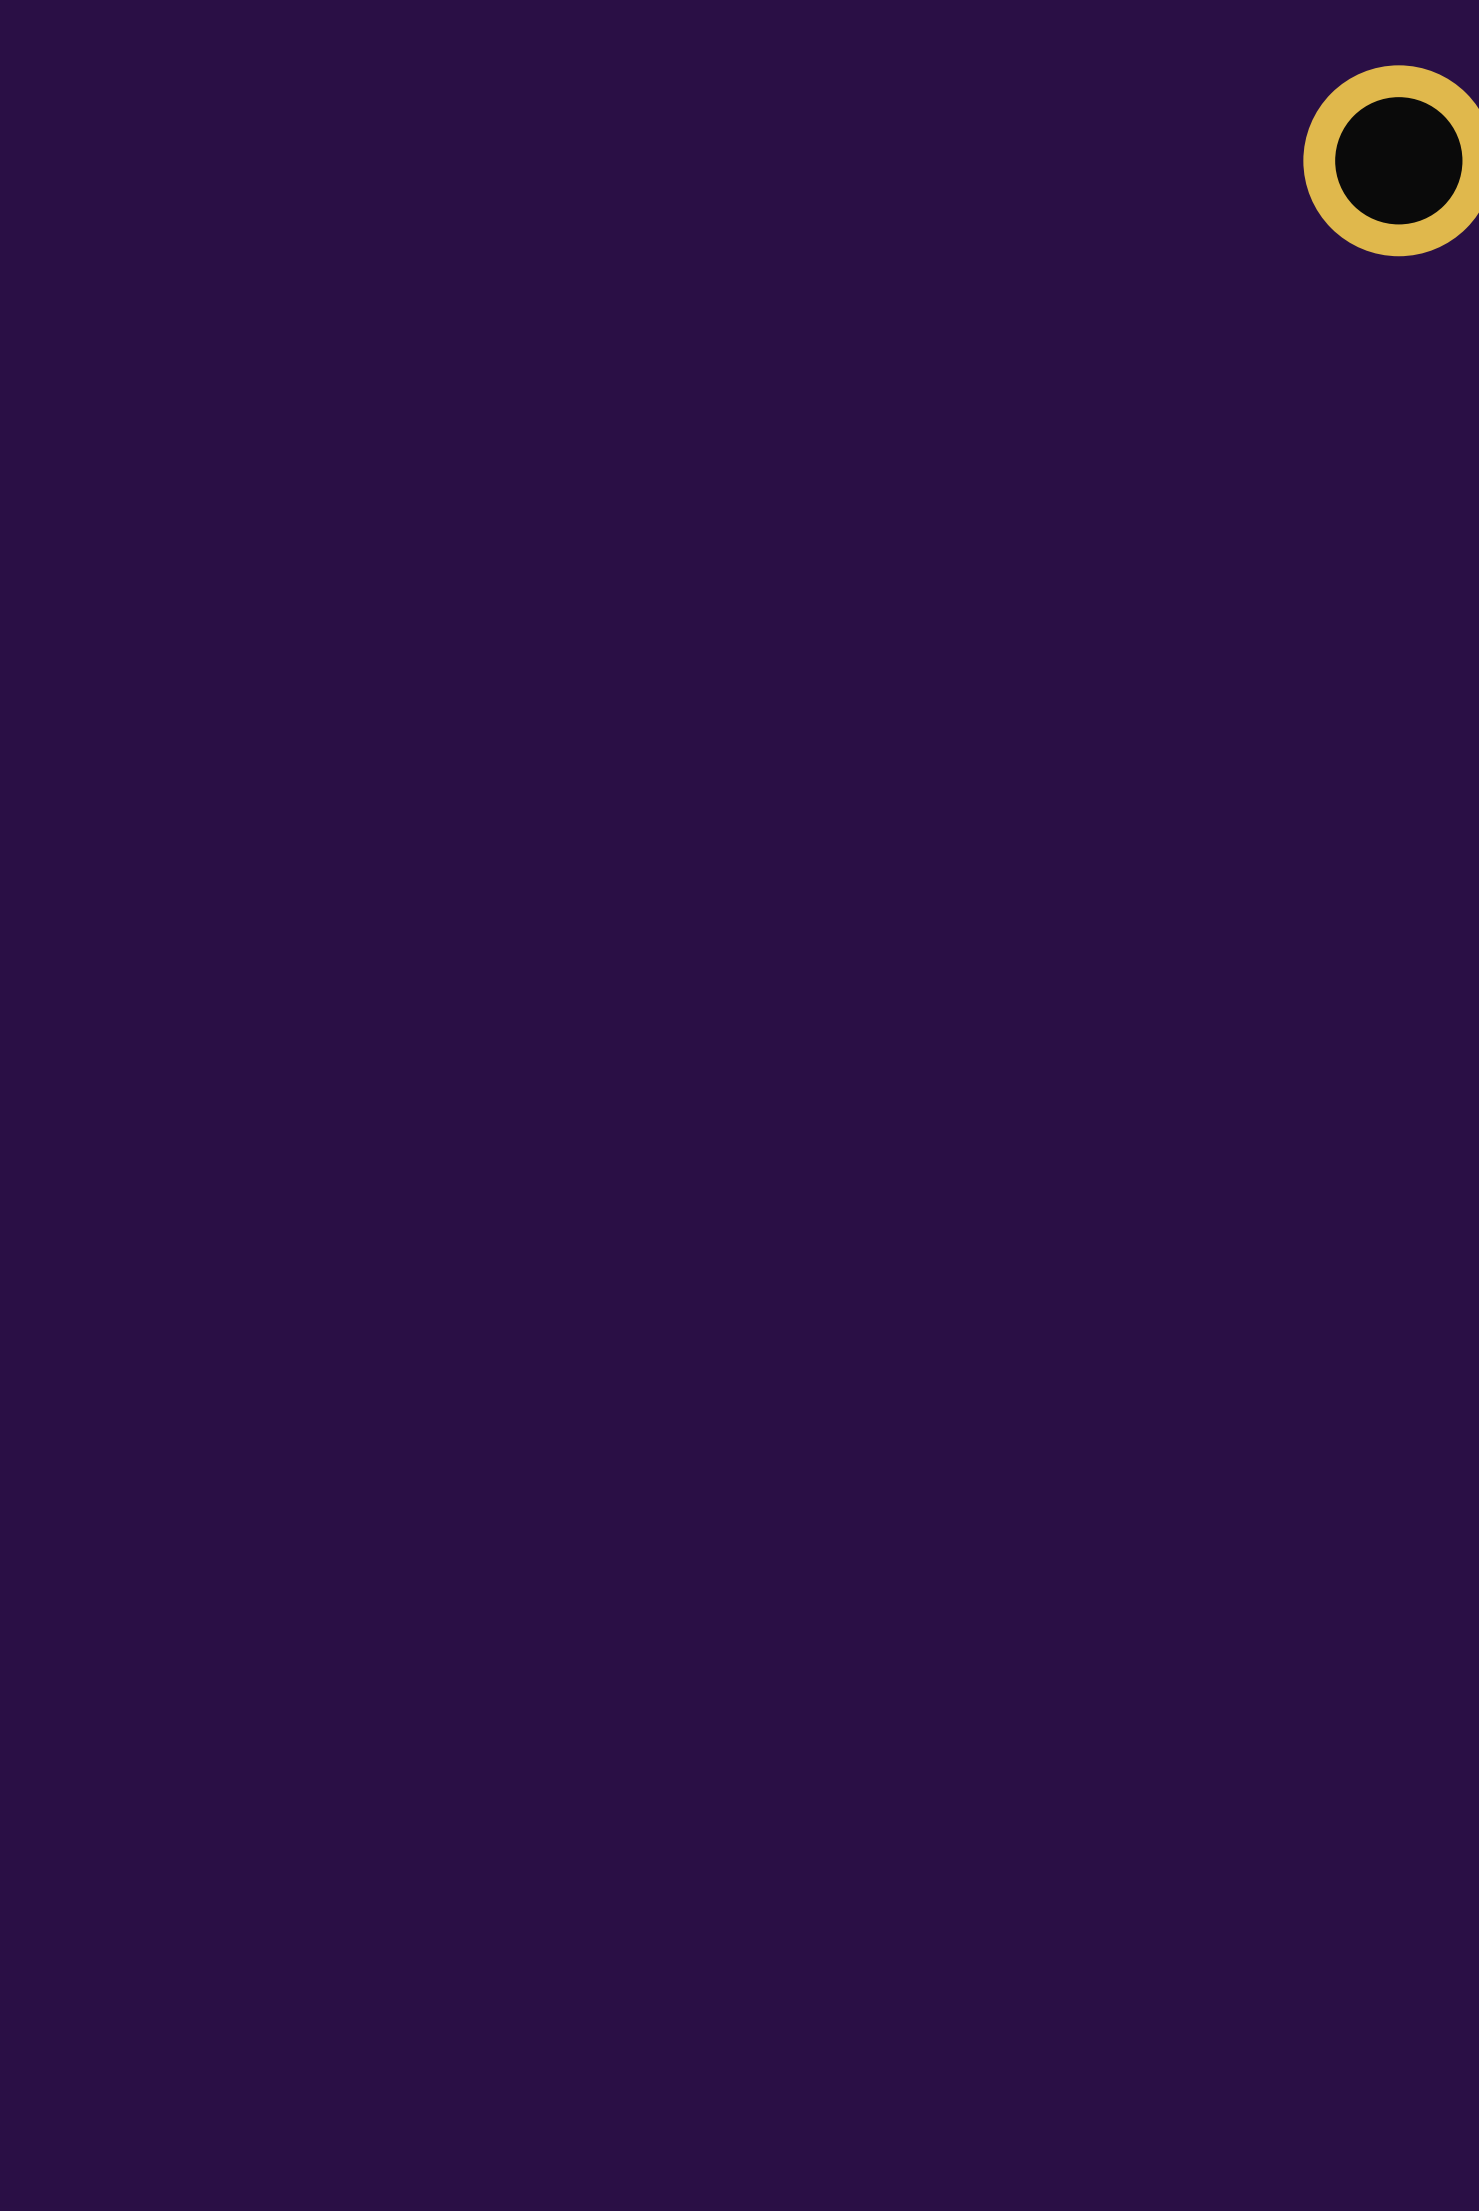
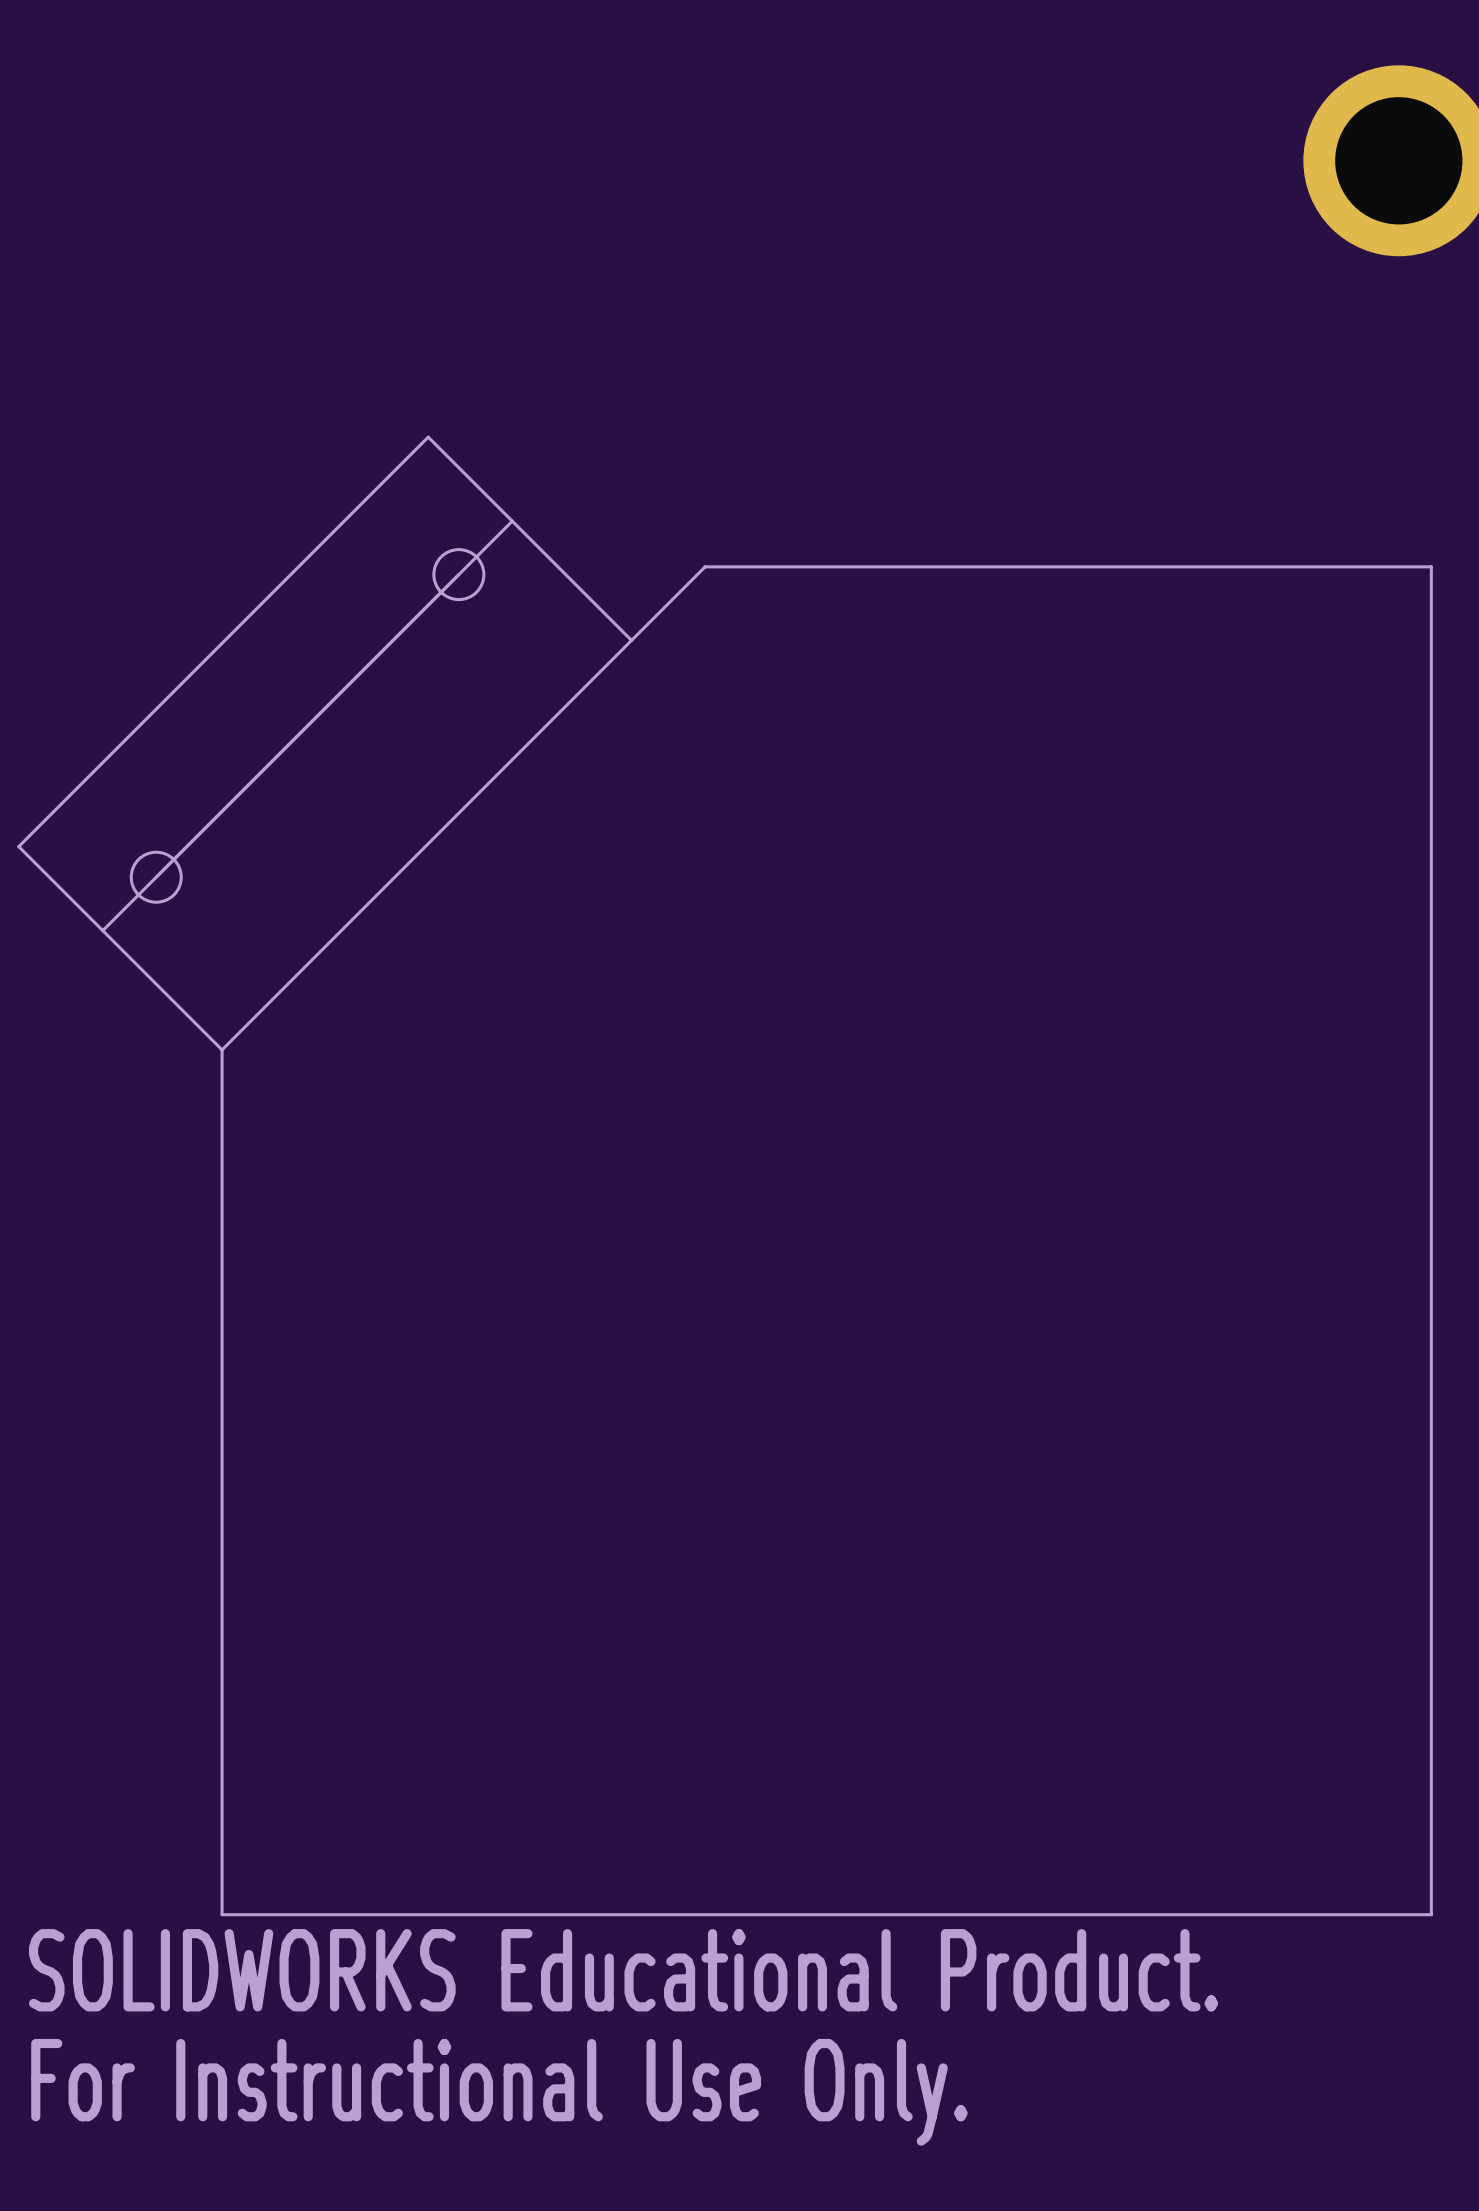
line: none -> (512, 521) (102, 930)
drawing: none -> [432, 548, 486, 602]
line: none -> (631, 640) (428, 437) (18, 846) (222, 1049)
drawing: none -> [129, 850, 183, 904]
line: none -> (222, 1049) (222, 1914) (1431, 1914) (1431, 566) (705, 566) (222, 1049)
text: none -> SOLIDWORKS Educational Product. (623, 1970)
text: none -> For Instructional Use Only. (499, 2092)

